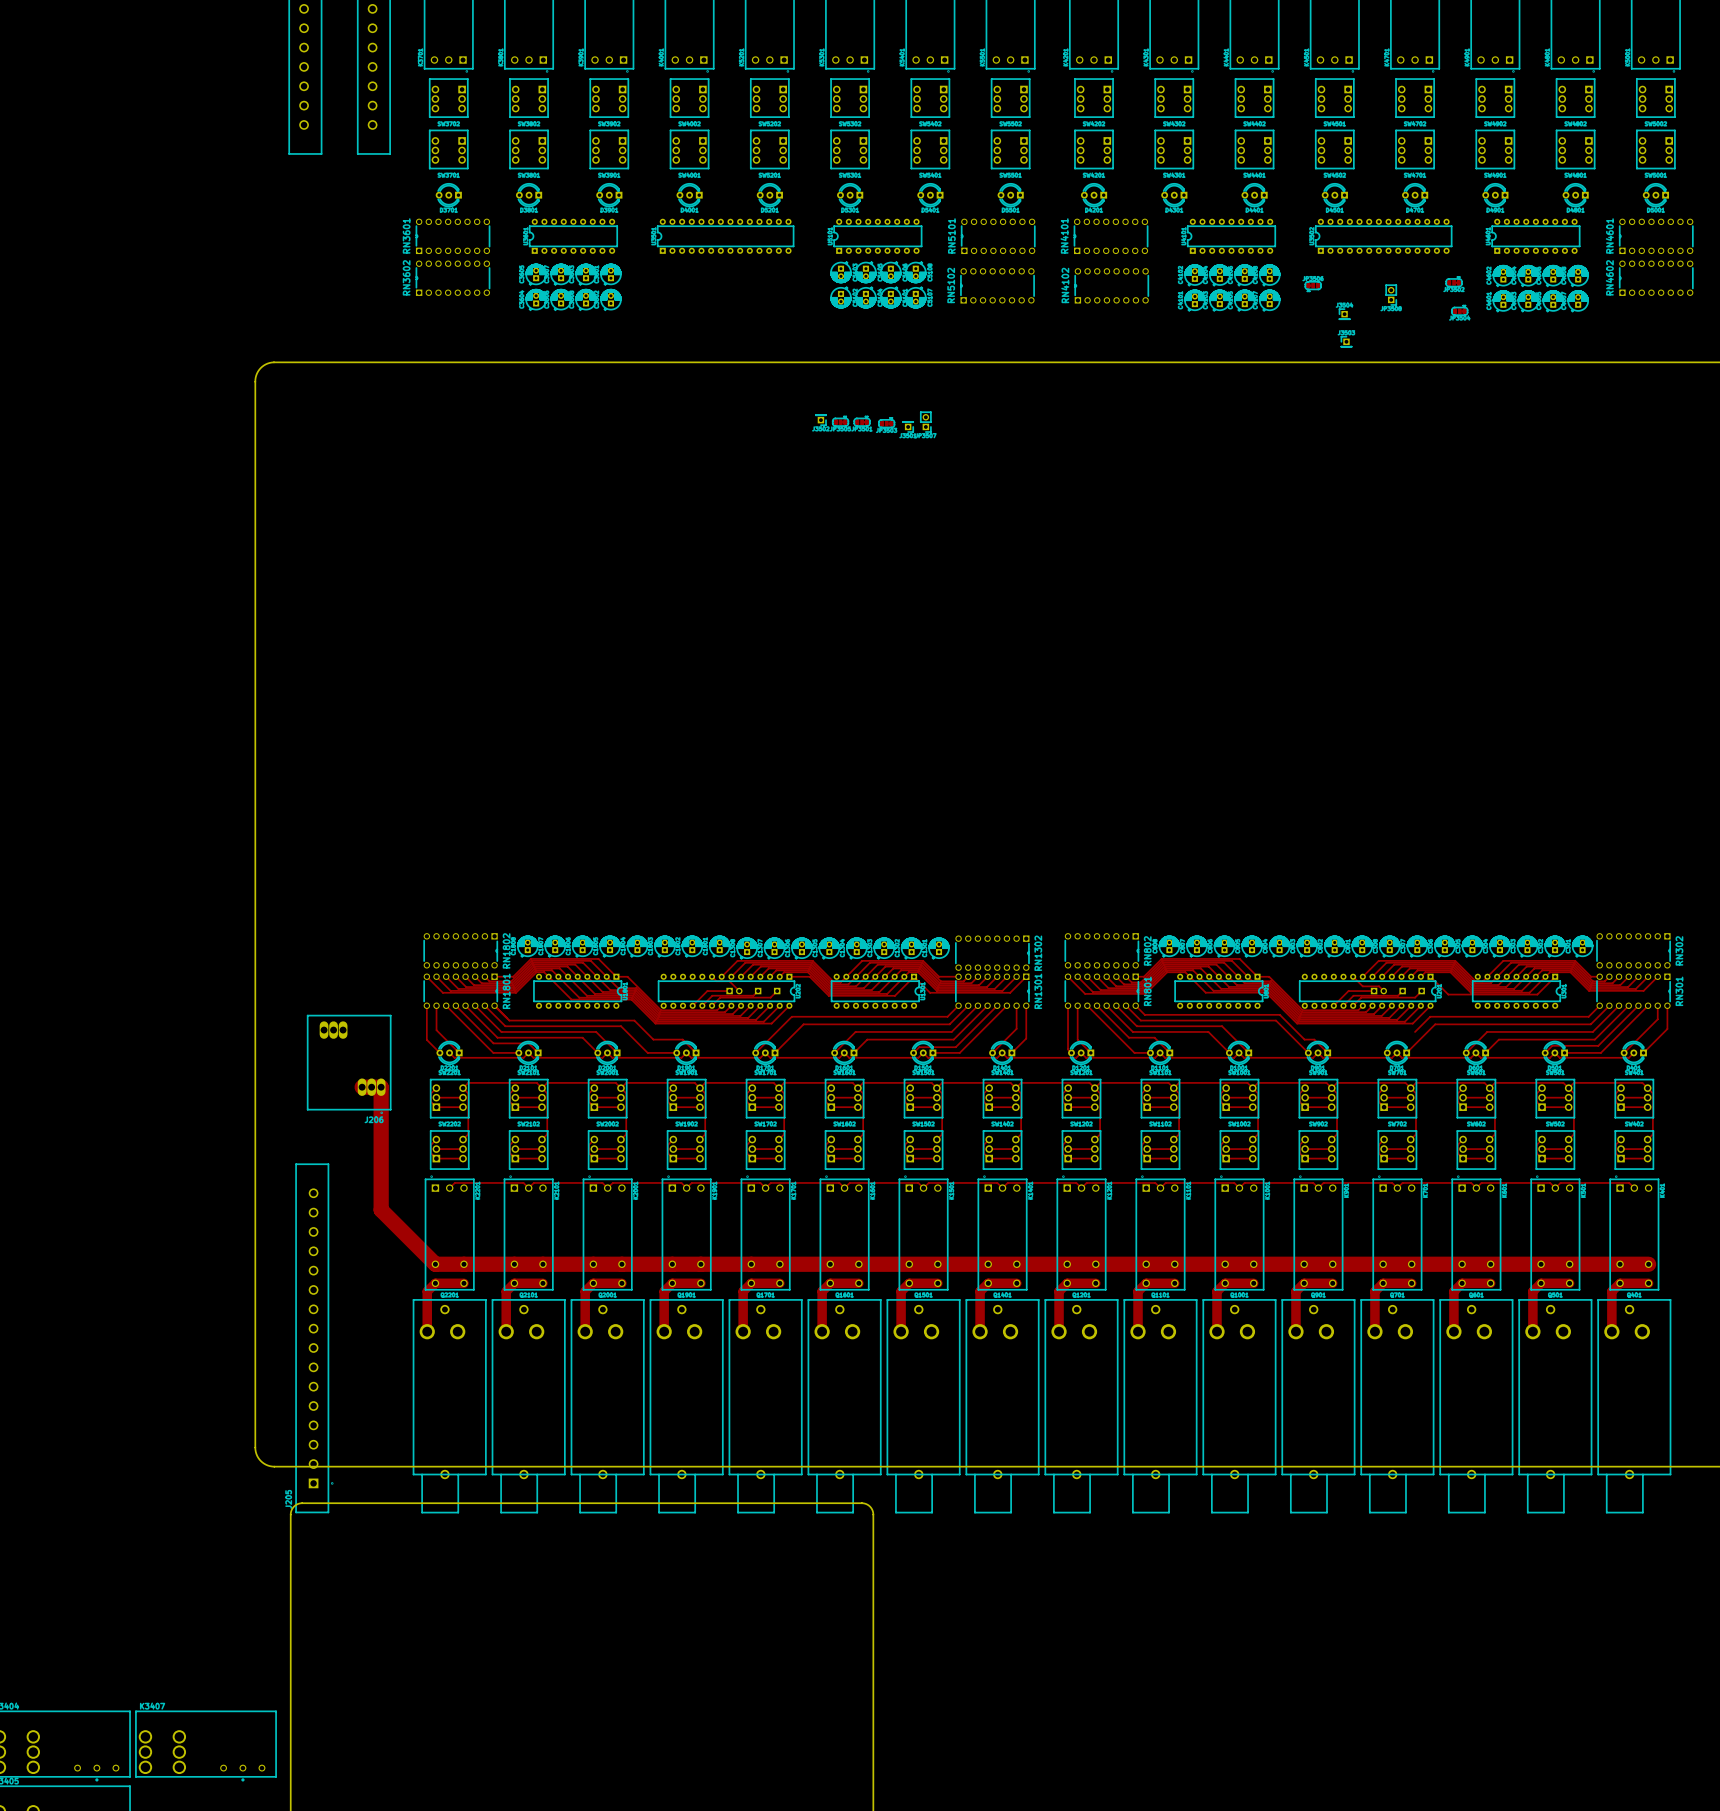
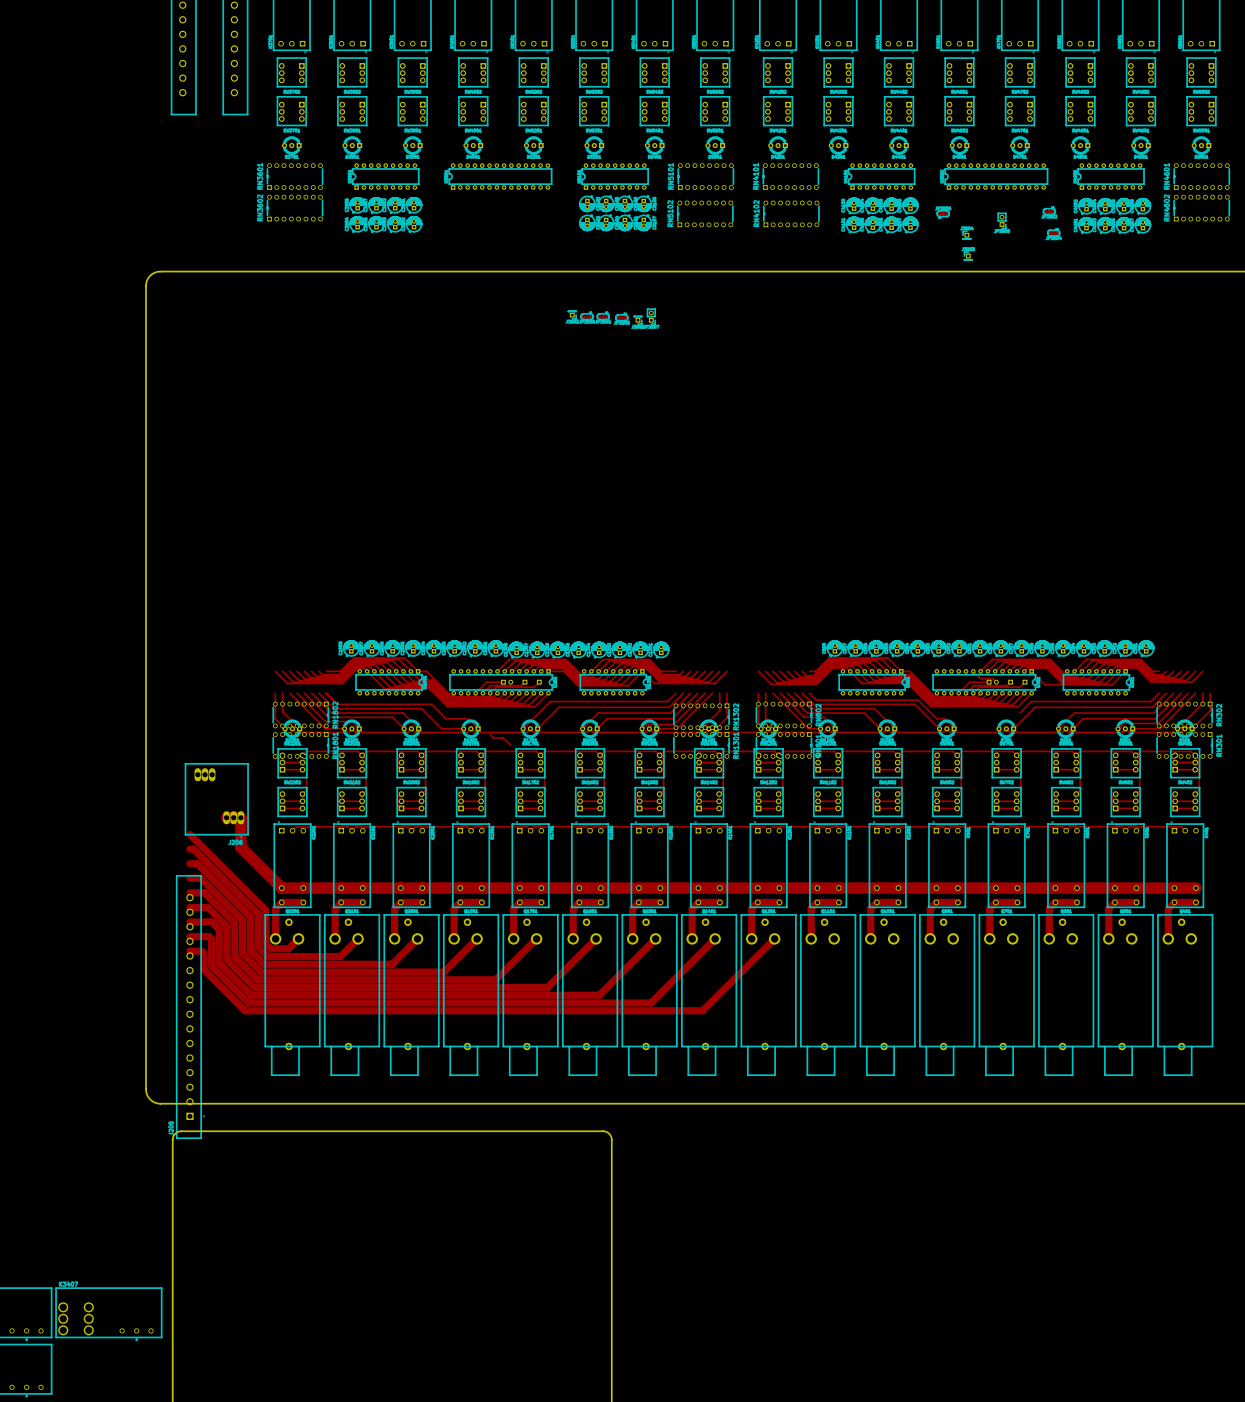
part: none -> (524, 682)
part: none -> (539, 682)
part: none -> (1010, 682)
part: none -> (1024, 682)
part position: (527, 946) -> (351, 648)
part position: (555, 946) -> (372, 648)
part position: (582, 946) -> (392, 648)
part position: (610, 946) -> (413, 648)
part position: (637, 946) -> (433, 648)
part position: (664, 946) -> (454, 648)
part position: (692, 946) -> (475, 648)
part position: (719, 946) -> (495, 648)
part position: (1169, 946) -> (834, 648)
part position: (1196, 946) -> (855, 648)
part position: (1224, 946) -> (876, 648)
part position: (1252, 946) -> (897, 648)
part position: (1279, 946) -> (917, 648)
part position: (1307, 946) -> (938, 648)
part position: (1334, 946) -> (959, 648)
part position: (1362, 946) -> (980, 648)
part position: (1389, 946) -> (1000, 648)
part position: (1417, 946) -> (1021, 648)
part position: (1444, 946) -> (1042, 648)
part position: (1472, 946) -> (1063, 648)
part position: (1499, 946) -> (1083, 648)
part position: (1527, 946) -> (1104, 648)
part position: (1555, 946) -> (1125, 648)
part position: (1582, 946) -> (1146, 648)
part position: (747, 948) -> (516, 650)
part position: (774, 948) -> (537, 650)
part position: (801, 948) -> (557, 650)
part position: (829, 948) -> (578, 650)
part position: (856, 948) -> (599, 650)
part position: (884, 948) -> (619, 650)
part position: (911, 948) -> (640, 650)
part position: (939, 948) -> (661, 650)
track: (426, 976) (442, 992) (516, 992) (536, 972) (544, 972) (571, 999) (631, 999) (655, 1023) (771, 1023) (789, 1005) -> (275, 671) (287, 683) (342, 683) (357, 668) (363, 668) (384, 688) (429, 688) (447, 706) (535, 706) (548, 693)
track: (436, 976) (450, 990) (515, 990) (535, 970) (551, 970) (579, 997) (632, 997) (656, 1021) (763, 1021) (779, 1005) -> (282, 671) (293, 682) (341, 682) (357, 666) (369, 666) (390, 687) (430, 687) (448, 705) (529, 705) (541, 693)
track: (446, 976) (458, 988) (514, 988) (534, 968) (559, 968) (587, 995) (633, 995) (657, 1019) (756, 1019) (770, 1005) -> (289, 671) (299, 680) (341, 680) (356, 665) (375, 665) (396, 685) (430, 685) (448, 703) (523, 703) (533, 693)
track: (455, 976) (466, 987) (513, 987) (534, 966) (567, 966) (594, 993) (633, 993) (657, 1017) (748, 1017) (760, 1005) -> (297, 671) (304, 679) (340, 679) (356, 663) (381, 663) (401, 684) (431, 684) (449, 702) (517, 702) (526, 693)
track: (465, 976) (473, 985) (512, 985) (533, 964) (575, 964) (602, 991) (634, 991) (658, 1015) (740, 1015) (750, 1005) -> (304, 671) (310, 677) (340, 677) (355, 662) (387, 662) (407, 682) (431, 682) (450, 700) (511, 700) (519, 693)
track: (475, 976) (481, 983) (512, 983) (532, 962) (583, 962) (610, 990) (635, 990) (659, 1014) (732, 1014) (741, 1005) -> (311, 671) (316, 676) (339, 676) (354, 660) (393, 660) (413, 681) (432, 681) (450, 699) (505, 699) (512, 693)
track: (484, 976) (489, 981) (511, 981) (531, 960) (590, 960) (618, 988) (636, 988) (660, 1012) (724, 1012) (731, 1005) -> (319, 671) (322, 674) (338, 674) (354, 659) (398, 659) (419, 680) (433, 680) (451, 698) (499, 698) (504, 693)
track: (494, 976) (513, 976) (530, 958) (598, 958) (616, 976) (627, 976) (661, 1010) (717, 1010) (721, 1005) -> (326, 671) (340, 671) (353, 658) (404, 658) (418, 671) (426, 671) (451, 696) (494, 696) (497, 693)
track: (958, 976) (938, 976) (923, 960) (862, 960) (840, 982) (834, 982) (812, 960) (737, 960) (721, 976) -> (675, 671) (661, 671) (649, 659) (603, 659) (587, 675) (582, 675) (566, 659) (509, 659) (497, 671)
track: (968, 976) (963, 981) (940, 981) (922, 962) (870, 962) (848, 984) (833, 984) (811, 962) (745, 962) (731, 976) -> (683, 671) (679, 674) (662, 674) (648, 660) (609, 660) (592, 677) (581, 677) (565, 660) (515, 660) (504, 671)
track: (977, 976) (971, 983) (939, 983) (921, 964) (877, 964) (856, 986) (832, 986) (811, 964) (753, 964) (741, 976) -> (690, 671) (685, 676) (661, 676) (647, 662) (615, 662) (598, 678) (581, 678) (564, 662) (521, 662) (512, 671)
track: (987, 976) (979, 985) (939, 985) (920, 966) (885, 966) (863, 988) (831, 988) (810, 966) (760, 966) (750, 976) -> (697, 671) (691, 677) (661, 677) (647, 663) (620, 663) (604, 680) (580, 680) (564, 663) (527, 663) (519, 671)
track: (997, 976) (986, 987) (938, 987) (919, 968) (893, 968) (871, 990) (831, 990) (809, 968) (768, 968) (760, 976) -> (705, 671) (697, 679) (660, 679) (646, 665) (626, 665) (610, 681) (579, 681) (563, 665) (532, 665) (526, 671)
track: (1006, 976) (994, 988) (937, 988) (919, 970) (901, 970) (879, 991) (830, 991) (808, 970) (776, 970) (770, 976) -> (712, 671) (703, 680) (660, 680) (646, 666) (632, 666) (616, 682) (579, 682) (563, 666) (538, 666) (533, 671)
track: (1016, 976) (1002, 990) (936, 990) (918, 972) (908, 972) (887, 993) (829, 993) (807, 972) (784, 972) (779, 976) -> (719, 671) (709, 682) (659, 682) (645, 668) (638, 668) (622, 684) (578, 684) (562, 668) (544, 668) (541, 671)
track: (1026, 976) (1010, 992) (930, 992) (914, 976) (895, 995) (828, 995) (809, 976) (789, 976) -> (727, 671) (714, 683) (654, 683) (642, 671) (628, 685) (578, 685) (563, 671) (548, 671)
track: (1068, 976) (1085, 993) (1145, 993) (1167, 972) (1185, 972) (1205, 992) (1266, 992) (1297, 1023) (1412, 1023) (1430, 1005) -> (758, 671) (771, 684) (816, 684) (833, 668) (846, 668) (862, 683) (907, 683) (931, 706) (1018, 706) (1031, 693)
track: (1077, 976) (1092, 991) (1144, 991) (1166, 970) (1193, 970) (1213, 990) (1267, 990) (1297, 1021) (1404, 1021) (1420, 1005) -> (765, 671) (777, 682) (816, 682) (832, 666) (852, 666) (868, 681) (908, 681) (931, 705) (1012, 705) (1024, 693)
track: (1087, 976) (1100, 990) (1144, 990) (1165, 968) (1200, 968) (1221, 988) (1267, 988) (1298, 1019) (1397, 1019) (1411, 1005) -> (773, 671) (783, 681) (815, 681) (832, 665) (858, 665) (873, 680) (909, 680) (932, 703) (1006, 703) (1017, 693)
track: (1097, 976) (1108, 988) (1143, 988) (1164, 966) (1208, 966) (1229, 986) (1268, 986) (1299, 1017) (1389, 1017) (1401, 1005) -> (780, 671) (788, 680) (815, 680) (831, 663) (864, 663) (879, 679) (909, 679) (932, 702) (1000, 702) (1009, 693)
track: (1106, 976) (1116, 986) (1142, 986) (1164, 964) (1216, 964) (1236, 985) (1269, 985) (1300, 1015) (1381, 1015) (1391, 1005) -> (787, 671) (794, 678) (814, 678) (830, 662) (870, 662) (885, 677) (910, 677) (933, 700) (994, 700) (1002, 693)
track: (1116, 976) (1124, 984) (1141, 984) (1163, 962) (1224, 962) (1244, 983) (1270, 983) (1301, 1014) (1373, 1014) (1382, 1005) -> (794, 671) (800, 677) (813, 677) (830, 660) (876, 660) (891, 676) (910, 676) (934, 699) (988, 699) (995, 693)
track: (1126, 976) (1131, 982) (1140, 982) (1162, 960) (1231, 960) (1252, 981) (1270, 981) (1301, 1012) (1366, 1012) (1372, 1005) -> (802, 671) (806, 675) (813, 675) (829, 659) (882, 659) (897, 674) (911, 674) (934, 698) (983, 698) (987, 693)
track: (1135, 976) (1143, 976) (1161, 958) (1239, 958) (1257, 976) (1269, 976) (1302, 1010) (1358, 1010) (1362, 1005) -> (809, 671) (815, 671) (829, 658) (887, 658) (901, 671) (910, 671) (935, 696) (977, 696) (980, 693)
track: (1353, 976) (1362, 986) (1379, 986) (1383, 991) -> (973, 671) (980, 678) (992, 678) (996, 682)
track: (1430, 976) (1448, 994) (1537, 994) (1555, 976) -> (1031, 671) (1045, 684) (1112, 684) (1125, 671)
track: (1599, 976) (1591, 976) (1575, 960) (1503, 960) (1483, 981) (1475, 981) (1455, 960) (1378, 960) (1362, 976) -> (1159, 671) (1152, 671) (1140, 659) (1086, 659) (1071, 674) (1065, 674) (1050, 659) (992, 659) (980, 671)
track: (1609, 976) (1604, 981) (1593, 981) (1574, 962) (1511, 962) (1490, 983) (1474, 983) (1454, 962) (1386, 962) (1372, 976) -> (1166, 671) (1162, 674) (1154, 674) (1140, 660) (1092, 660) (1077, 676) (1065, 676) (1049, 660) (998, 660) (987, 671)
track: (1619, 976) (1612, 983) (1592, 983) (1573, 964) (1518, 964) (1498, 985) (1474, 985) (1453, 964) (1394, 964) (1382, 976) -> (1173, 671) (1168, 676) (1153, 676) (1139, 662) (1098, 662) (1082, 677) (1064, 677) (1049, 662) (1004, 662) (995, 671)
track: (1628, 976) (1620, 985) (1591, 985) (1572, 966) (1526, 966) (1506, 986) (1473, 986) (1452, 966) (1402, 966) (1391, 976) -> (1180, 671) (1174, 677) (1152, 677) (1138, 663) (1104, 663) (1088, 679) (1063, 679) (1048, 663) (1010, 663) (1002, 671)
track: (1638, 976) (1628, 987) (1590, 987) (1572, 968) (1534, 968) (1514, 988) (1472, 988) (1452, 968) (1409, 968) (1401, 976) -> (1188, 671) (1180, 679) (1152, 679) (1138, 665) (1109, 665) (1094, 680) (1063, 680) (1047, 665) (1016, 665) (1009, 671)
track: (1648, 976) (1635, 988) (1589, 988) (1571, 970) (1542, 970) (1521, 990) (1471, 990) (1451, 970) (1417, 970) (1411, 976) -> (1195, 671) (1186, 680) (1151, 680) (1137, 666) (1115, 666) (1100, 681) (1062, 681) (1047, 666) (1021, 666) (1017, 671)
track: (1657, 976) (1643, 990) (1589, 990) (1570, 972) (1549, 972) (1529, 992) (1470, 992) (1450, 972) (1425, 972) (1420, 976) -> (1202, 671) (1192, 682) (1151, 682) (1137, 668) (1121, 668) (1106, 683) (1062, 683) (1046, 668) (1027, 668) (1024, 671)
part position: (577, 991) -> (388, 682)
part position: (726, 991) -> (501, 682)
track: (729, 991) (707, 991) (692, 1005) -> (503, 682) (486, 682) (475, 693)
part position: (734, 991) -> (507, 682)
track: (758, 991) (753, 995) (712, 995) (702, 1005) -> (524, 682) (521, 685) (490, 685) (482, 693)
part: (758, 991) -> none
track: (777, 991) (770, 997) (720, 997) (712, 1005) -> (539, 682) (534, 687) (496, 687) (490, 693)
part: (777, 991) -> none
part position: (875, 991) -> (613, 682)
part position: (1218, 991) -> (872, 682)
part position: (1367, 991) -> (984, 682)
track: (1374, 991) (1348, 991) (1333, 1005) -> (989, 682) (969, 682) (958, 693)
part position: (1378, 991) -> (992, 682)
track: (1402, 991) (1397, 995) (1353, 995) (1343, 1005) -> (1010, 682) (1007, 685) (973, 685) (966, 693)
part: (1402, 991) -> none
track: (1421, 991) (1415, 997) (1361, 997) (1353, 1005) -> (1024, 682) (1020, 687) (979, 687) (973, 693)
part: (1421, 991) -> none
part position: (1516, 991) -> (1096, 682)
track: (426, 1005) (426, 1039) (439, 1052) -> (275, 693) (275, 719) (285, 728)
track: (436, 1005) (436, 1030) (459, 1052) -> (282, 693) (282, 711) (299, 728)
track: (446, 1005) (493, 1052) (518, 1052) -> (289, 693) (325, 728) (344, 728)
track: (455, 1005) (493, 1043) (528, 1043) (538, 1052) -> (297, 693) (325, 721) (352, 721) (359, 728)
track: (465, 1005) (497, 1037) (582, 1037) (597, 1052) -> (304, 693) (328, 717) (392, 717) (404, 728)
track: (475, 1005) (501, 1031) (596, 1031) (617, 1052) -> (311, 693) (331, 713) (402, 713) (418, 728)
track: (484, 1005) (505, 1026) (621, 1026) (647, 1052) (676, 1052) -> (319, 693) (334, 708) (421, 708) (441, 728) (463, 728)
track: (494, 1005) (509, 1020) (634, 1020) (653, 1039) (682, 1039) (696, 1052) -> (326, 693) (337, 704) (431, 704) (446, 718) (468, 718) (478, 728)
track: (958, 1005) (947, 1016) (791, 1016) (755, 1052) -> (675, 693) (667, 701) (550, 701) (523, 728)
track: (968, 1005) (949, 1024) (803, 1024) (775, 1052) -> (683, 693) (669, 707) (559, 707) (537, 728)
track: (977, 1005) (951, 1031) (855, 1031) (834, 1052) -> (690, 693) (670, 713) (598, 713) (582, 728)
track: (987, 1005) (953, 1039) (867, 1039) (853, 1052) -> (697, 693) (672, 718) (607, 718) (597, 728)
track: (997, 1005) (955, 1047) (919, 1047) (913, 1052) -> (705, 693) (673, 724) (646, 724) (642, 728)
track: (1006, 1005) (959, 1052) (932, 1052) -> (712, 693) (676, 728) (656, 728)
track: (1016, 1005) (1016, 1028) (992, 1052) -> (719, 693) (719, 710) (701, 728)
track: (1026, 1005) (1026, 1038) (1011, 1052) -> (727, 693) (727, 717) (716, 728)
track: (1068, 1005) (1068, 1049) (1071, 1052) -> (758, 693) (758, 726) (761, 728)
track: (1077, 1005) (1077, 1039) (1090, 1052) -> (765, 693) (765, 718) (775, 728)
track: (1087, 1005) (1134, 1052) (1150, 1052) -> (773, 693) (808, 728) (820, 728)
track: (1097, 1005) (1128, 1037) (1154, 1037) (1169, 1052) -> (780, 693) (804, 717) (823, 717) (835, 728)
track: (1106, 1005) (1132, 1031) (1208, 1031) (1229, 1052) -> (787, 693) (807, 713) (864, 713) (880, 728)
track: (1116, 1005) (1136, 1026) (1222, 1026) (1248, 1052) -> (794, 693) (810, 708) (874, 708) (894, 728)
track: (1126, 1005) (1140, 1020) (1275, 1020) (1308, 1052) -> (802, 693) (813, 704) (915, 704) (939, 728)
track: (1135, 1005) (1144, 1014) (1279, 1014) (1304, 1039) (1314, 1039) (1327, 1052) -> (809, 693) (816, 700) (918, 700) (936, 718) (944, 718) (954, 728)
track: (1599, 1005) (1588, 1016) (1430, 1016) (1415, 1031) -> (1159, 693) (1150, 701) (1031, 701) (1019, 713)
track: (1609, 1005) (1590, 1024) (1435, 1024) (1406, 1052) -> (1166, 693) (1152, 707) (1035, 707) (1013, 728)
track: (1619, 1005) (1592, 1031) (1487, 1031) (1466, 1052) -> (1173, 693) (1153, 713) (1074, 713) (1058, 728)
track: (1628, 1005) (1594, 1039) (1498, 1039) (1485, 1052) -> (1180, 693) (1155, 718) (1083, 718) (1073, 728)
track: (1638, 1005) (1598, 1045) (1552, 1045) (1545, 1052) -> (1188, 693) (1158, 723) (1123, 723) (1118, 728)
track: (1648, 1005) (1600, 1052) (1564, 1052) -> (1195, 693) (1160, 728) (1132, 728)
track: (1657, 1005) (1657, 1019) (1624, 1052) -> (1202, 693) (1202, 703) (1177, 728)
track: (1667, 1005) (1667, 1029) (1643, 1052) -> (1210, 693) (1210, 710) (1192, 728)
track: (449, 1052) (454, 1057) (523, 1057) (528, 1052) (533, 1057) (602, 1057) (607, 1052) (612, 1057) (681, 1057) (686, 1052) (691, 1057) (760, 1057) (765, 1052) (770, 1057) (839, 1057) (844, 1052) (849, 1057) (918, 1057) (923, 1052) (928, 1057) (997, 1057) (1002, 1052) (1007, 1057) (1076, 1057) (1081, 1052) (1086, 1057) (1155, 1057) (1160, 1052) (1164, 1057) (1234, 1057) (1239, 1052) (1243, 1057) (1313, 1057) (1318, 1052) (1322, 1057) (1392, 1057) (1396, 1052) (1401, 1057) (1471, 1057) (1475, 1052) (1480, 1057) (1550, 1057) (1554, 1052) (1559, 1057) (1628, 1057) (1633, 1052) -> (292, 728) (296, 732) (348, 732) (351, 728) (355, 732) (407, 732) (411, 728) (415, 732) (467, 732) (470, 728) (474, 732) (526, 732) (530, 728) (534, 732) (586, 732) (589, 728) (593, 732) (645, 732) (649, 728) (653, 732) (705, 732) (708, 728) (712, 732) (764, 732) (768, 728) (772, 732) (824, 732) (827, 728) (831, 732) (883, 732) (887, 728) (891, 732) (943, 732) (946, 728) (950, 732) (1002, 732) (1006, 728) (1010, 732) (1062, 732) (1065, 728) (1069, 732) (1121, 732) (1125, 728) (1129, 732) (1181, 732) (1184, 728)
part position: (449, 1052) -> (292, 728)
part position: (528, 1052) -> (351, 728)
part position: (607, 1052) -> (411, 728)
part position: (686, 1052) -> (470, 728)
part position: (765, 1052) -> (530, 728)
part position: (844, 1052) -> (589, 728)
part position: (923, 1052) -> (649, 728)
part position: (1002, 1052) -> (708, 728)
part position: (1081, 1052) -> (768, 728)
part position: (1160, 1052) -> (827, 728)
part position: (1239, 1052) -> (887, 728)
part position: (1318, 1052) -> (946, 728)
part position: (1396, 1052) -> (1006, 728)
part position: (1475, 1052) -> (1065, 728)
part position: (1554, 1052) -> (1125, 728)
part position: (1633, 1052) -> (1184, 728)
track: (436, 1088) (431, 1093) (431, 1101) (436, 1107) (463, 1107) -> (282, 755) (278, 759) (278, 765) (282, 769) (302, 769)
track: (515, 1088) (510, 1093) (510, 1101) (515, 1107) (542, 1107) -> (341, 755) (338, 759) (338, 765) (341, 769) (362, 769)
track: (542, 1088) (547, 1082) (615, 1082) (626, 1093) (626, 1134) (620, 1139) -> (362, 755) (366, 751) (417, 751) (425, 759) (425, 790) (421, 794)
track: (594, 1088) (589, 1093) (589, 1101) (594, 1107) (620, 1107) -> (401, 755) (397, 759) (397, 765) (401, 769) (421, 769)
track: (620, 1088) (626, 1082) (694, 1082) (705, 1093) (705, 1134) (699, 1139) -> (421, 755) (425, 751) (477, 751) (485, 759) (485, 790) (481, 794)
track: (673, 1088) (668, 1093) (668, 1101) (673, 1107) (699, 1107) -> (461, 755) (457, 759) (457, 765) (461, 769) (481, 769)
track: (699, 1088) (705, 1082) (773, 1082) (784, 1093) (784, 1134) (778, 1139) -> (481, 755) (485, 751) (536, 751) (544, 759) (544, 790) (540, 794)
track: (752, 1088) (747, 1093) (747, 1101) (752, 1107) (778, 1107) -> (520, 755) (516, 759) (516, 765) (520, 769) (540, 769)
track: (778, 1088) (784, 1082) (852, 1082) (863, 1093) (863, 1134) (857, 1139) -> (540, 755) (544, 751) (596, 751) (604, 759) (604, 790) (600, 794)
track: (831, 1088) (826, 1093) (826, 1101) (831, 1107) (857, 1107) -> (580, 755) (576, 759) (576, 765) (580, 769) (600, 769)
track: (857, 1088) (863, 1082) (931, 1082) (942, 1093) (942, 1134) (936, 1139) -> (600, 755) (604, 751) (655, 751) (663, 759) (663, 790) (659, 794)
track: (910, 1088) (905, 1093) (905, 1101) (910, 1107) (936, 1107) -> (639, 755) (635, 759) (635, 765) (639, 769) (659, 769)
track: (936, 1088) (942, 1082) (1010, 1082) (1021, 1093) (1021, 1134) (1015, 1139) -> (659, 755) (663, 751) (715, 751) (723, 759) (723, 790) (719, 794)
track: (989, 1088) (983, 1093) (983, 1101) (989, 1107) (1015, 1107) -> (699, 755) (695, 759) (695, 765) (699, 769) (719, 769)
track: (1015, 1088) (1021, 1082) (1089, 1082) (1100, 1093) (1100, 1134) (1094, 1139) -> (719, 755) (723, 751) (774, 751) (782, 759) (782, 790) (778, 794)
track: (1068, 1088) (1062, 1093) (1062, 1101) (1068, 1107) (1094, 1107) -> (758, 755) (754, 759) (754, 765) (758, 769) (778, 769)
track: (1094, 1088) (1100, 1082) (1168, 1082) (1179, 1093) (1179, 1134) (1173, 1139) -> (778, 755) (782, 751) (834, 751) (842, 759) (842, 790) (838, 794)
track: (1147, 1088) (1141, 1093) (1141, 1101) (1147, 1107) (1173, 1107) -> (818, 755) (814, 759) (814, 765) (818, 769) (838, 769)
track: (1173, 1088) (1179, 1082) (1247, 1082) (1258, 1093) (1258, 1134) (1252, 1139) -> (838, 755) (842, 751) (893, 751) (901, 759) (901, 790) (897, 794)
track: (1226, 1088) (1220, 1093) (1220, 1101) (1226, 1107) (1252, 1107) -> (877, 755) (873, 759) (873, 765) (877, 769) (897, 769)
track: (1252, 1088) (1258, 1082) (1326, 1082) (1337, 1093) (1337, 1134) (1331, 1139) -> (897, 755) (901, 751) (953, 751) (961, 759) (961, 790) (957, 794)
track: (1305, 1088) (1299, 1093) (1299, 1101) (1305, 1107) (1331, 1107) -> (937, 755) (933, 759) (933, 765) (937, 769) (957, 769)
track: (1331, 1088) (1337, 1082) (1405, 1082) (1415, 1093) (1415, 1134) (1410, 1139) -> (957, 755) (961, 751) (1012, 751) (1020, 759) (1020, 790) (1016, 794)
track: (1384, 1088) (1378, 1093) (1378, 1101) (1384, 1107) (1410, 1107) -> (996, 755) (992, 759) (992, 765) (996, 769) (1016, 769)
track: (1410, 1088) (1415, 1082) (1484, 1082) (1494, 1093) (1494, 1134) (1489, 1139) -> (1016, 755) (1020, 751) (1072, 751) (1080, 759) (1080, 790) (1076, 794)
track: (1463, 1088) (1457, 1093) (1457, 1101) (1463, 1107) (1489, 1107) -> (1056, 755) (1052, 759) (1052, 765) (1056, 769) (1076, 769)
track: (1489, 1088) (1494, 1082) (1563, 1082) (1573, 1093) (1573, 1134) (1568, 1139) -> (1076, 755) (1080, 751) (1131, 751) (1139, 759) (1139, 790) (1135, 794)
track: (1542, 1088) (1536, 1093) (1536, 1101) (1542, 1107) (1568, 1107) -> (1115, 755) (1111, 759) (1111, 765) (1115, 769) (1135, 769)
track: (1568, 1088) (1573, 1082) (1642, 1082) (1652, 1093) (1652, 1134) (1647, 1139) -> (1135, 755) (1139, 751) (1191, 751) (1199, 759) (1199, 790) (1195, 794)
track: (1621, 1088) (1615, 1093) (1615, 1101) (1621, 1107) (1647, 1107) -> (1175, 755) (1171, 759) (1171, 765) (1175, 769) (1195, 769)
track: (436, 1097) (463, 1097) -> (282, 762) (302, 762)
track: (989, 1097) (1015, 1097) -> (699, 762) (719, 762)
track: (1068, 1097) (1094, 1097) -> (758, 762) (778, 762)
track: (1621, 1097) (1647, 1097) -> (1175, 762) (1195, 762)
part position: (449, 1098) -> (292, 763)
part position: (528, 1098) -> (352, 763)
part position: (607, 1098) -> (411, 763)
part position: (686, 1098) -> (471, 763)
part position: (765, 1098) -> (530, 763)
part position: (844, 1098) -> (590, 763)
part position: (923, 1098) -> (649, 763)
part position: (1002, 1098) -> (709, 763)
part position: (1081, 1098) -> (768, 763)
part position: (1160, 1098) -> (828, 763)
part position: (1239, 1098) -> (887, 763)
part position: (1318, 1098) -> (947, 763)
part position: (1397, 1098) -> (1006, 763)
part position: (1476, 1098) -> (1066, 763)
part position: (1555, 1098) -> (1125, 763)
part position: (1634, 1098) -> (1185, 763)
track: none -> (189, 834) (265, 910) (265, 943) (270, 948) (288, 948) (298, 938)
track: (381, 1126) (381, 1210) (435, 1264) (1648, 1264) -> (240, 847) (281, 888) (1195, 888)
track: none -> (189, 849) (193, 849) (257, 913) (257, 946) (267, 956) (340, 956) (358, 938)
track: (436, 1139) (431, 1144) (431, 1153) (436, 1158) (463, 1158) -> (282, 794) (278, 798) (278, 804) (282, 808) (302, 808)
track: (463, 1139) (468, 1134) (468, 1093) (463, 1088) (468, 1082) (536, 1082) (547, 1093) (547, 1134) (542, 1139) -> (302, 794) (306, 790) (306, 759) (302, 755) (306, 751) (358, 751) (366, 759) (366, 790) (362, 794)
track: (515, 1139) (510, 1144) (510, 1153) (515, 1158) (542, 1158) -> (341, 794) (338, 798) (338, 804) (341, 808) (362, 808)
track: (594, 1139) (589, 1144) (589, 1153) (594, 1158) (620, 1158) -> (401, 794) (397, 798) (397, 804) (401, 808) (421, 808)
track: (673, 1139) (668, 1144) (668, 1153) (673, 1158) (699, 1158) -> (461, 794) (457, 798) (457, 804) (461, 808) (481, 808)
track: (752, 1139) (747, 1144) (747, 1153) (752, 1158) (778, 1158) -> (520, 794) (516, 798) (516, 804) (520, 808) (540, 808)
track: (831, 1139) (826, 1144) (826, 1153) (831, 1158) (857, 1158) -> (580, 794) (576, 798) (576, 804) (580, 808) (600, 808)
track: (910, 1139) (905, 1144) (905, 1153) (910, 1158) (936, 1158) -> (639, 794) (635, 798) (635, 804) (639, 808) (659, 808)
track: (989, 1139) (983, 1144) (983, 1153) (989, 1158) (1015, 1158) -> (699, 794) (695, 798) (695, 804) (699, 808) (719, 808)
track: (1068, 1139) (1062, 1144) (1062, 1153) (1068, 1158) (1094, 1158) -> (758, 794) (754, 798) (754, 804) (758, 808) (778, 808)
track: (1147, 1139) (1141, 1144) (1141, 1153) (1147, 1158) (1173, 1158) -> (818, 794) (814, 798) (814, 804) (818, 808) (838, 808)
track: (1226, 1139) (1220, 1144) (1220, 1153) (1226, 1158) (1252, 1158) -> (877, 794) (873, 798) (873, 804) (877, 808) (897, 808)
track: (1305, 1139) (1299, 1144) (1299, 1153) (1305, 1158) (1331, 1158) -> (937, 794) (933, 798) (933, 804) (937, 808) (957, 808)
track: (1384, 1139) (1378, 1144) (1378, 1153) (1384, 1158) (1410, 1158) -> (996, 794) (992, 798) (992, 804) (996, 808) (1016, 808)
track: (1463, 1139) (1457, 1144) (1457, 1153) (1463, 1158) (1489, 1158) -> (1056, 794) (1052, 798) (1052, 804) (1056, 808) (1076, 808)
track: (1542, 1139) (1536, 1144) (1536, 1153) (1542, 1158) (1568, 1158) -> (1115, 794) (1111, 798) (1111, 804) (1115, 808) (1135, 808)
track: (1621, 1139) (1615, 1144) (1615, 1153) (1621, 1158) (1647, 1158) -> (1175, 794) (1171, 798) (1171, 804) (1175, 808) (1195, 808)
track: none -> (189, 863) (197, 863) (250, 916) (250, 950) (264, 964) (392, 964) (417, 938)
track: (436, 1149) (463, 1149) -> (282, 801) (302, 801)
track: (515, 1149) (542, 1149) -> (341, 801) (362, 801)
track: (594, 1149) (620, 1149) -> (401, 801) (421, 801)
track: (673, 1149) (699, 1149) -> (461, 801) (481, 801)
track: (752, 1149) (778, 1149) -> (520, 801) (540, 801)
track: (830, 1149) (857, 1149) -> (579, 801) (600, 801)
track: (910, 1149) (936, 1149) -> (639, 801) (659, 801)
track: (989, 1149) (1015, 1149) -> (699, 801) (719, 801)
track: (1068, 1149) (1094, 1149) -> (758, 801) (778, 801)
track: (1147, 1149) (1173, 1149) -> (818, 801) (838, 801)
track: (1226, 1149) (1252, 1149) -> (877, 801) (897, 801)
track: (1305, 1149) (1331, 1149) -> (937, 801) (957, 801)
track: (1384, 1149) (1410, 1149) -> (996, 801) (1016, 801)
track: (1463, 1149) (1489, 1149) -> (1056, 801) (1076, 801)
track: (1542, 1149) (1568, 1149) -> (1115, 801) (1135, 801)
track: (1621, 1149) (1647, 1149) -> (1175, 801) (1195, 801)
part position: (449, 1150) -> (292, 801)
part position: (528, 1150) -> (352, 801)
part position: (607, 1150) -> (411, 801)
part position: (686, 1150) -> (471, 801)
part position: (765, 1150) -> (530, 801)
part position: (844, 1150) -> (590, 801)
part position: (923, 1150) -> (649, 801)
part position: (1002, 1150) -> (709, 801)
part position: (1081, 1150) -> (768, 801)
part position: (1160, 1150) -> (828, 801)
part position: (1239, 1150) -> (887, 801)
part position: (1318, 1150) -> (947, 801)
part position: (1397, 1150) -> (1006, 801)
part position: (1476, 1150) -> (1066, 801)
part position: (1555, 1150) -> (1125, 801)
part position: (1634, 1150) -> (1185, 801)
track: none -> (189, 878) (200, 878) (242, 919) (242, 953) (261, 972) (443, 972) (477, 938)
track: none -> (189, 892) (204, 892) (234, 923) (234, 956) (258, 979) (495, 979) (536, 938)
track: (449, 1188) (454, 1182) (523, 1182) (528, 1188) (533, 1182) (602, 1182) (607, 1188) (612, 1182) (681, 1182) (686, 1188) (691, 1182) (760, 1182) (765, 1188) (770, 1182) (839, 1182) (844, 1188) (849, 1182) (918, 1182) (923, 1188) (928, 1182) (997, 1182) (1002, 1188) (1007, 1182) (1076, 1182) (1081, 1188) (1086, 1182) (1155, 1182) (1160, 1188) (1165, 1182) (1234, 1182) (1239, 1188) (1244, 1182) (1313, 1182) (1318, 1188) (1323, 1182) (1392, 1182) (1397, 1188) (1402, 1182) (1471, 1182) (1476, 1188) (1481, 1182) (1550, 1182) (1555, 1188) (1560, 1182) (1629, 1182) (1634, 1188) -> (292, 830) (296, 826) (348, 826) (352, 830) (355, 826) (407, 826) (411, 830) (415, 826) (467, 826) (471, 830) (474, 826) (526, 826) (530, 830) (534, 826) (586, 826) (590, 830) (593, 826) (645, 826) (649, 830) (653, 826) (705, 826) (709, 830) (712, 826) (764, 826) (768, 830) (772, 826) (824, 826) (828, 830) (832, 826) (883, 826) (887, 830) (891, 826) (943, 826) (947, 830) (951, 826) (1002, 826) (1006, 830) (1010, 826) (1062, 826) (1066, 830) (1070, 826) (1121, 826) (1125, 830) (1129, 826) (1181, 826) (1185, 830)
track: none -> (189, 907) (208, 907) (226, 926) (226, 959) (254, 987) (547, 987) (596, 938)
track: none -> (189, 922) (211, 922) (219, 929) (219, 962) (251, 995) (599, 995) (655, 938)
part position: (449, 1232) -> (292, 864)
part position: (528, 1232) -> (352, 864)
part position: (607, 1232) -> (411, 864)
part position: (686, 1232) -> (471, 864)
part position: (765, 1232) -> (530, 864)
part position: (844, 1232) -> (590, 864)
part position: (923, 1232) -> (649, 864)
part position: (1002, 1232) -> (709, 864)
part position: (1081, 1232) -> (768, 864)
part position: (1160, 1232) -> (828, 864)
part position: (1239, 1232) -> (887, 864)
part position: (1318, 1232) -> (947, 864)
part position: (1397, 1232) -> (1006, 864)
part position: (1476, 1232) -> (1066, 864)
part position: (1555, 1232) -> (1125, 864)
part position: (1634, 1232) -> (1185, 864)
track: none -> (189, 936) (209, 936) (211, 939) (211, 966) (248, 1003) (651, 1003) (715, 938)
track: none -> (774, 938) (702, 1010) (245, 1010) (203, 969) (203, 953) (201, 951) (189, 951)
track: (463, 1283) (435, 1283) (427, 1291) (427, 1331) -> (303, 902) (281, 902) (275, 908) (275, 938)
track: (542, 1283) (514, 1283) (506, 1291) (506, 1331) -> (362, 902) (341, 902) (335, 908) (335, 938)
track: (621, 1283) (593, 1283) (585, 1291) (585, 1331) -> (422, 902) (400, 902) (394, 908) (394, 938)
track: (700, 1283) (672, 1283) (664, 1291) (664, 1331) -> (481, 902) (460, 902) (454, 908) (454, 938)
track: (779, 1283) (751, 1283) (743, 1291) (743, 1331) -> (541, 902) (519, 902) (513, 908) (513, 938)
track: (858, 1283) (830, 1283) (822, 1291) (822, 1331) -> (600, 902) (579, 902) (573, 908) (573, 938)
track: (937, 1283) (909, 1283) (901, 1291) (901, 1331) -> (660, 902) (638, 902) (632, 908) (632, 938)
track: (1016, 1283) (988, 1283) (980, 1291) (980, 1331) -> (719, 902) (698, 902) (692, 908) (692, 938)
track: (1095, 1283) (1067, 1283) (1059, 1291) (1059, 1331) -> (779, 902) (757, 902) (751, 908) (751, 938)
track: (1174, 1283) (1146, 1283) (1138, 1291) (1138, 1331) -> (838, 902) (817, 902) (811, 908) (811, 938)
track: (1253, 1283) (1225, 1283) (1216, 1291) (1216, 1331) -> (898, 902) (876, 902) (870, 908) (870, 938)
track: (1332, 1283) (1304, 1283) (1295, 1291) (1295, 1331) -> (957, 902) (936, 902) (930, 908) (930, 938)
track: (1411, 1283) (1383, 1283) (1374, 1291) (1374, 1331) -> (1017, 902) (995, 902) (989, 908) (989, 938)
track: (1490, 1283) (1462, 1283) (1453, 1291) (1453, 1331) -> (1076, 902) (1055, 902) (1049, 908) (1049, 938)
track: (1569, 1283) (1541, 1283) (1532, 1291) (1532, 1331) -> (1136, 902) (1114, 902) (1108, 908) (1108, 938)
track: (1648, 1283) (1620, 1283) (1611, 1291) (1611, 1331) -> (1195, 902) (1174, 902) (1168, 908) (1168, 938)
part position: (449, 1406) -> (292, 995)
part position: (528, 1406) -> (352, 995)
part position: (607, 1406) -> (411, 995)
part position: (686, 1406) -> (471, 995)
part position: (765, 1406) -> (530, 995)
part position: (844, 1406) -> (590, 995)
part position: (923, 1406) -> (649, 995)
part position: (1002, 1406) -> (709, 995)
part position: (1081, 1406) -> (768, 995)
part position: (1160, 1406) -> (828, 995)
part position: (1239, 1406) -> (887, 995)
part position: (1318, 1406) -> (947, 995)
part position: (1397, 1406) -> (1006, 995)
part position: (1476, 1406) -> (1066, 995)
part position: (1555, 1406) -> (1125, 995)
part position: (1634, 1406) -> (1185, 995)

